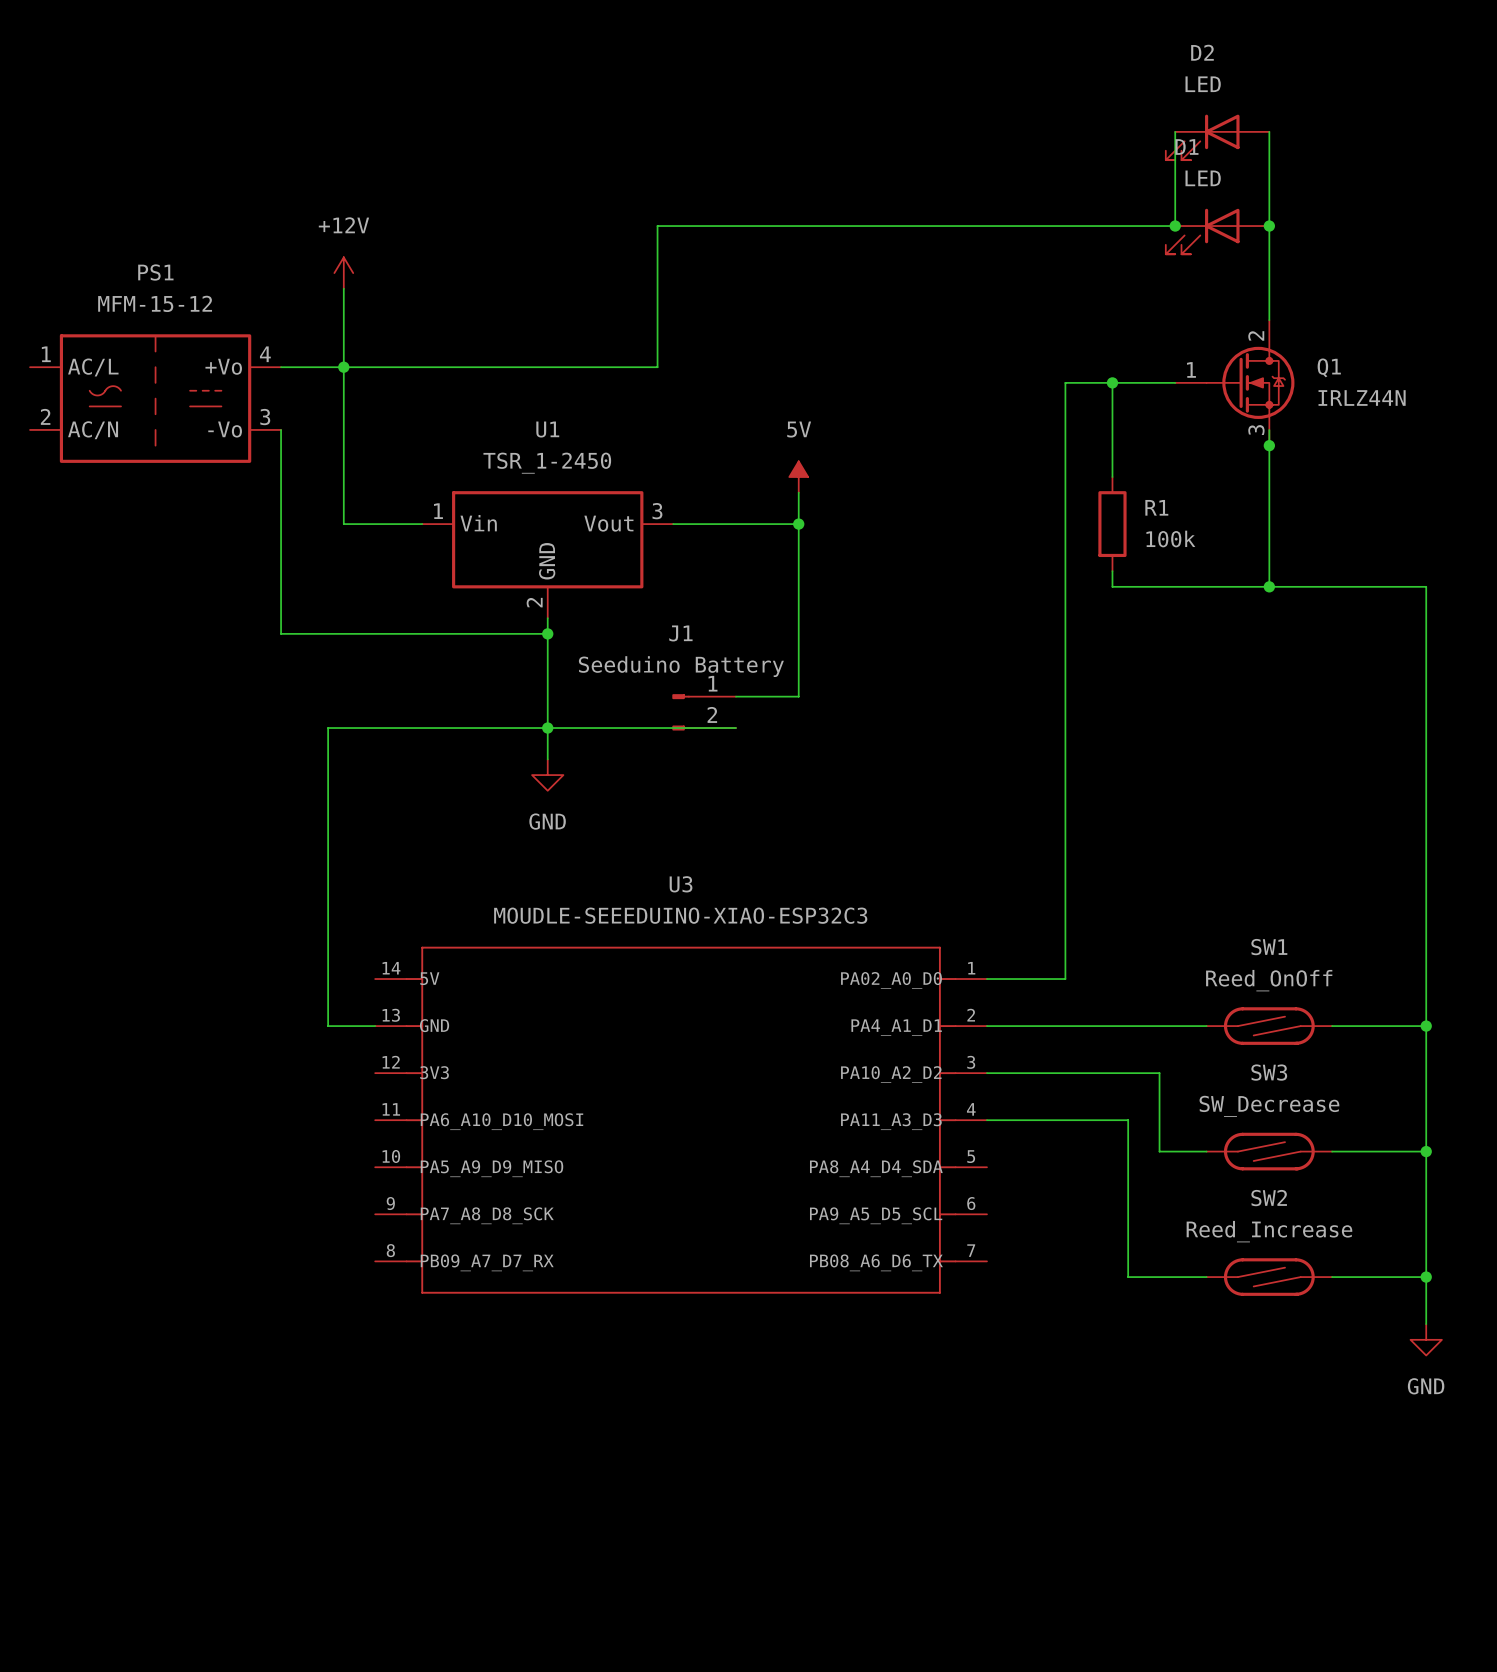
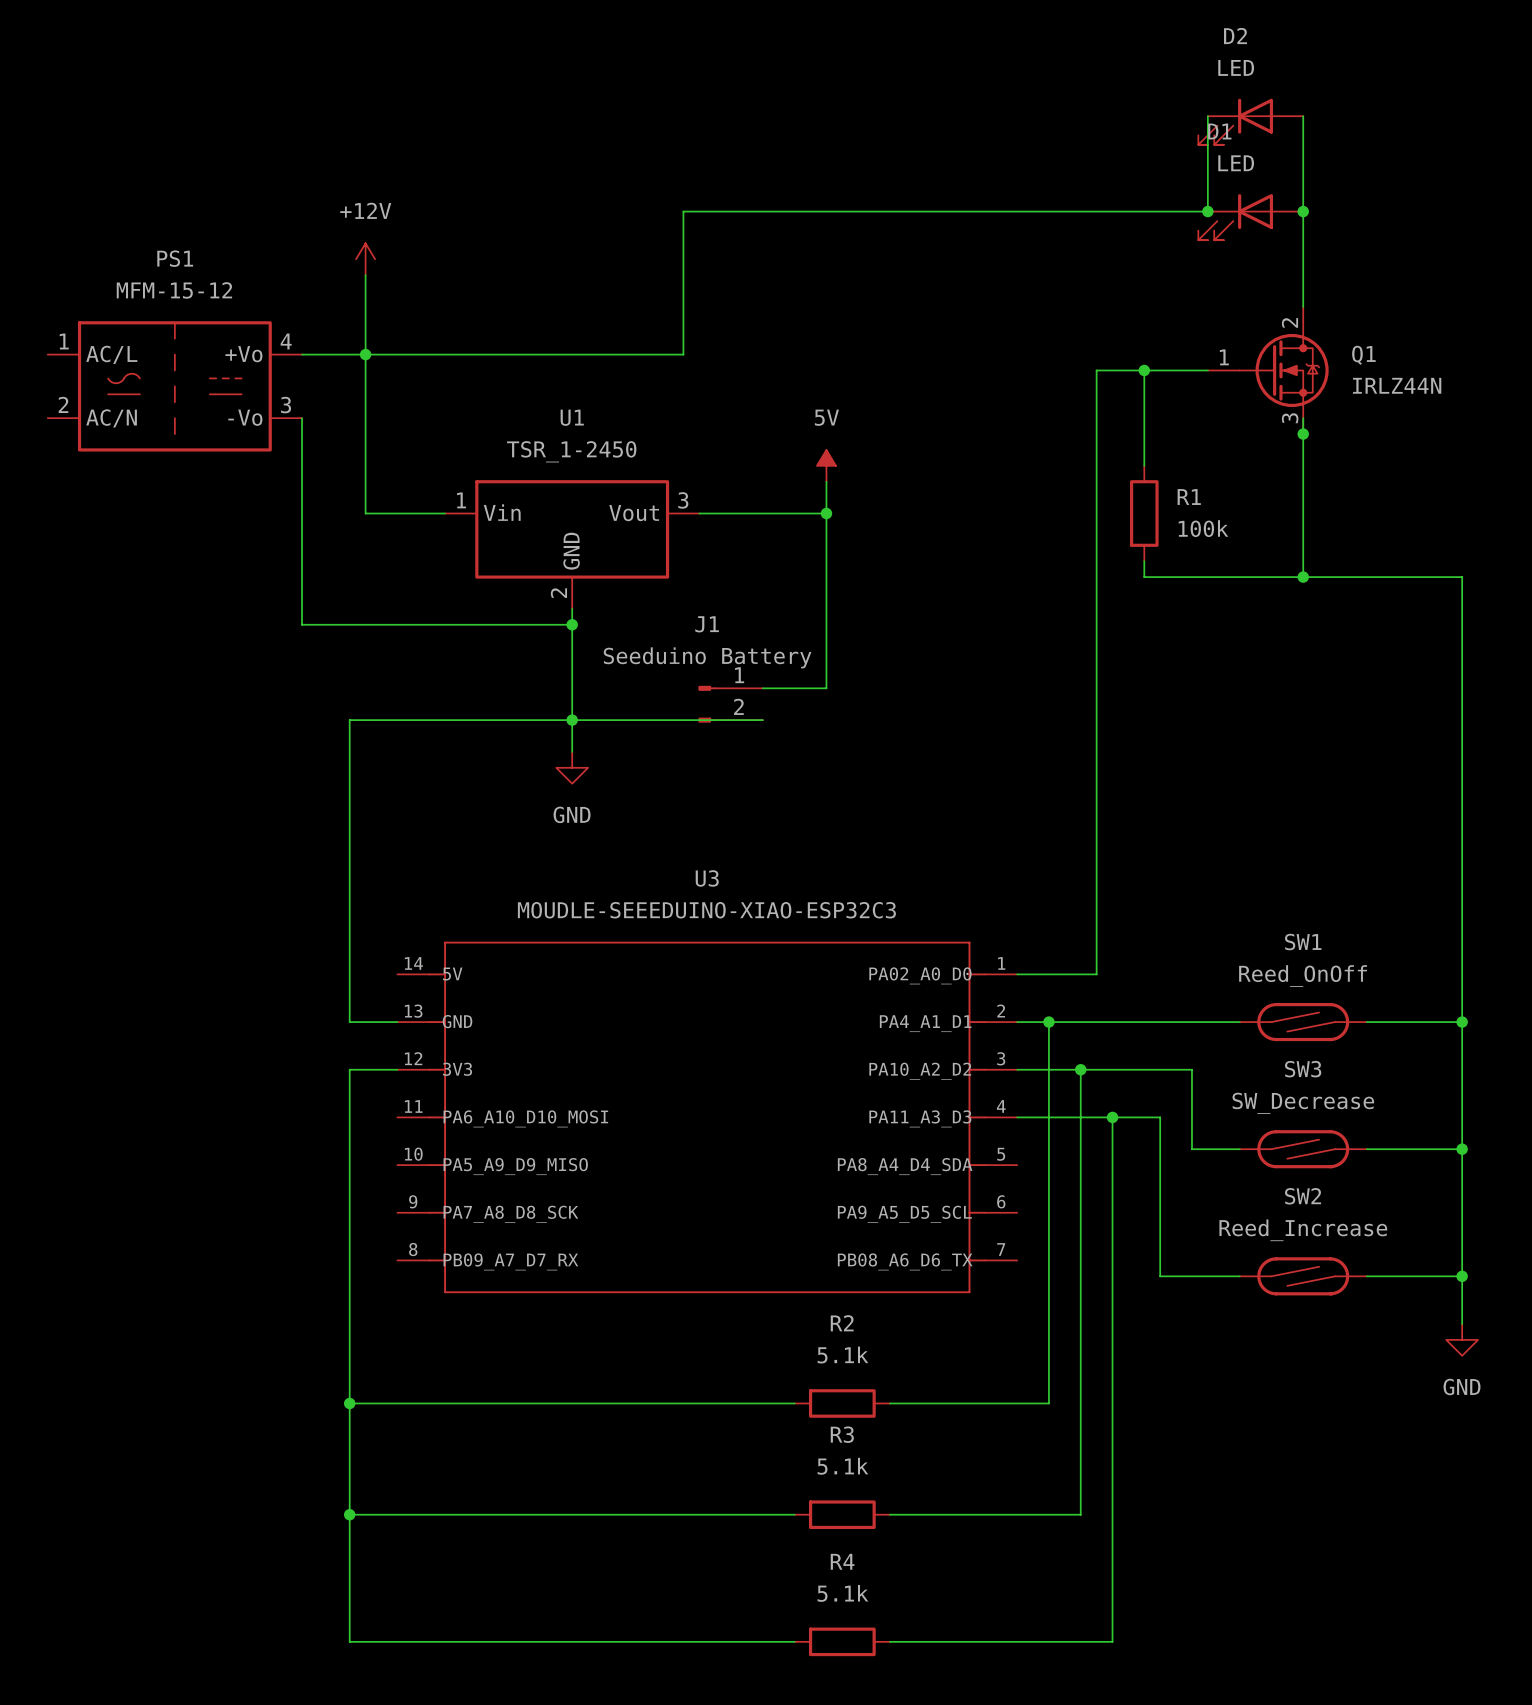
wire: none -> (1048, 1022) (1048, 1403) (890, 1403)
junction: none -> (1048, 1022)
wire: none -> (397, 1069) (349, 1069) (349, 1641) (794, 1641)
wire: none -> (1080, 1069) (1080, 1514) (890, 1514)
junction: none -> (1080, 1069)
wire: none -> (1112, 1117) (1112, 1641) (890, 1641)
junction: none -> (1112, 1117)
wire: none -> (349, 1403) (794, 1403)
junction: none -> (349, 1403)
R2: none -> 5.1k (842, 1403)
wire: none -> (349, 1514) (794, 1514)
junction: none -> (349, 1514)
R3: none -> 5.1k (842, 1514)
R4: none -> 5.1k (842, 1641)

